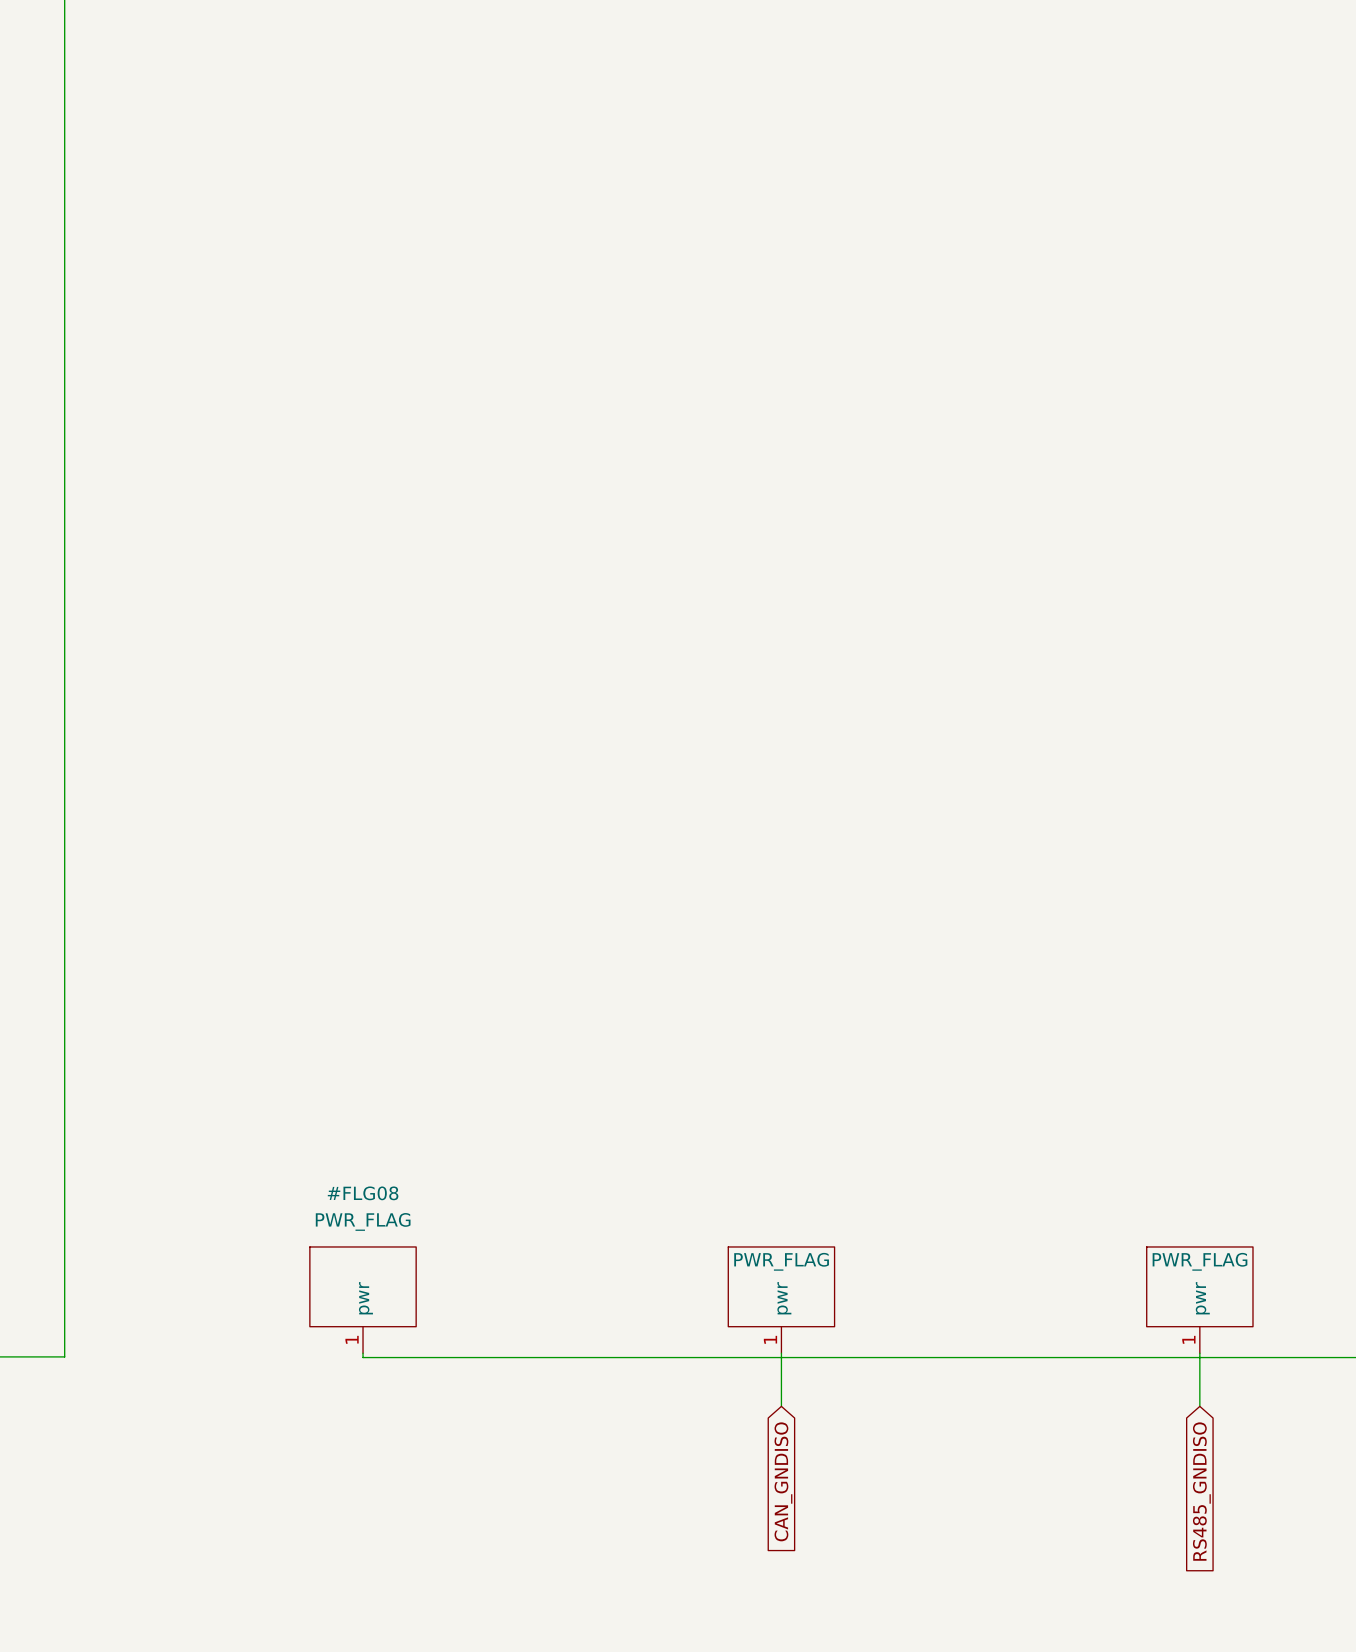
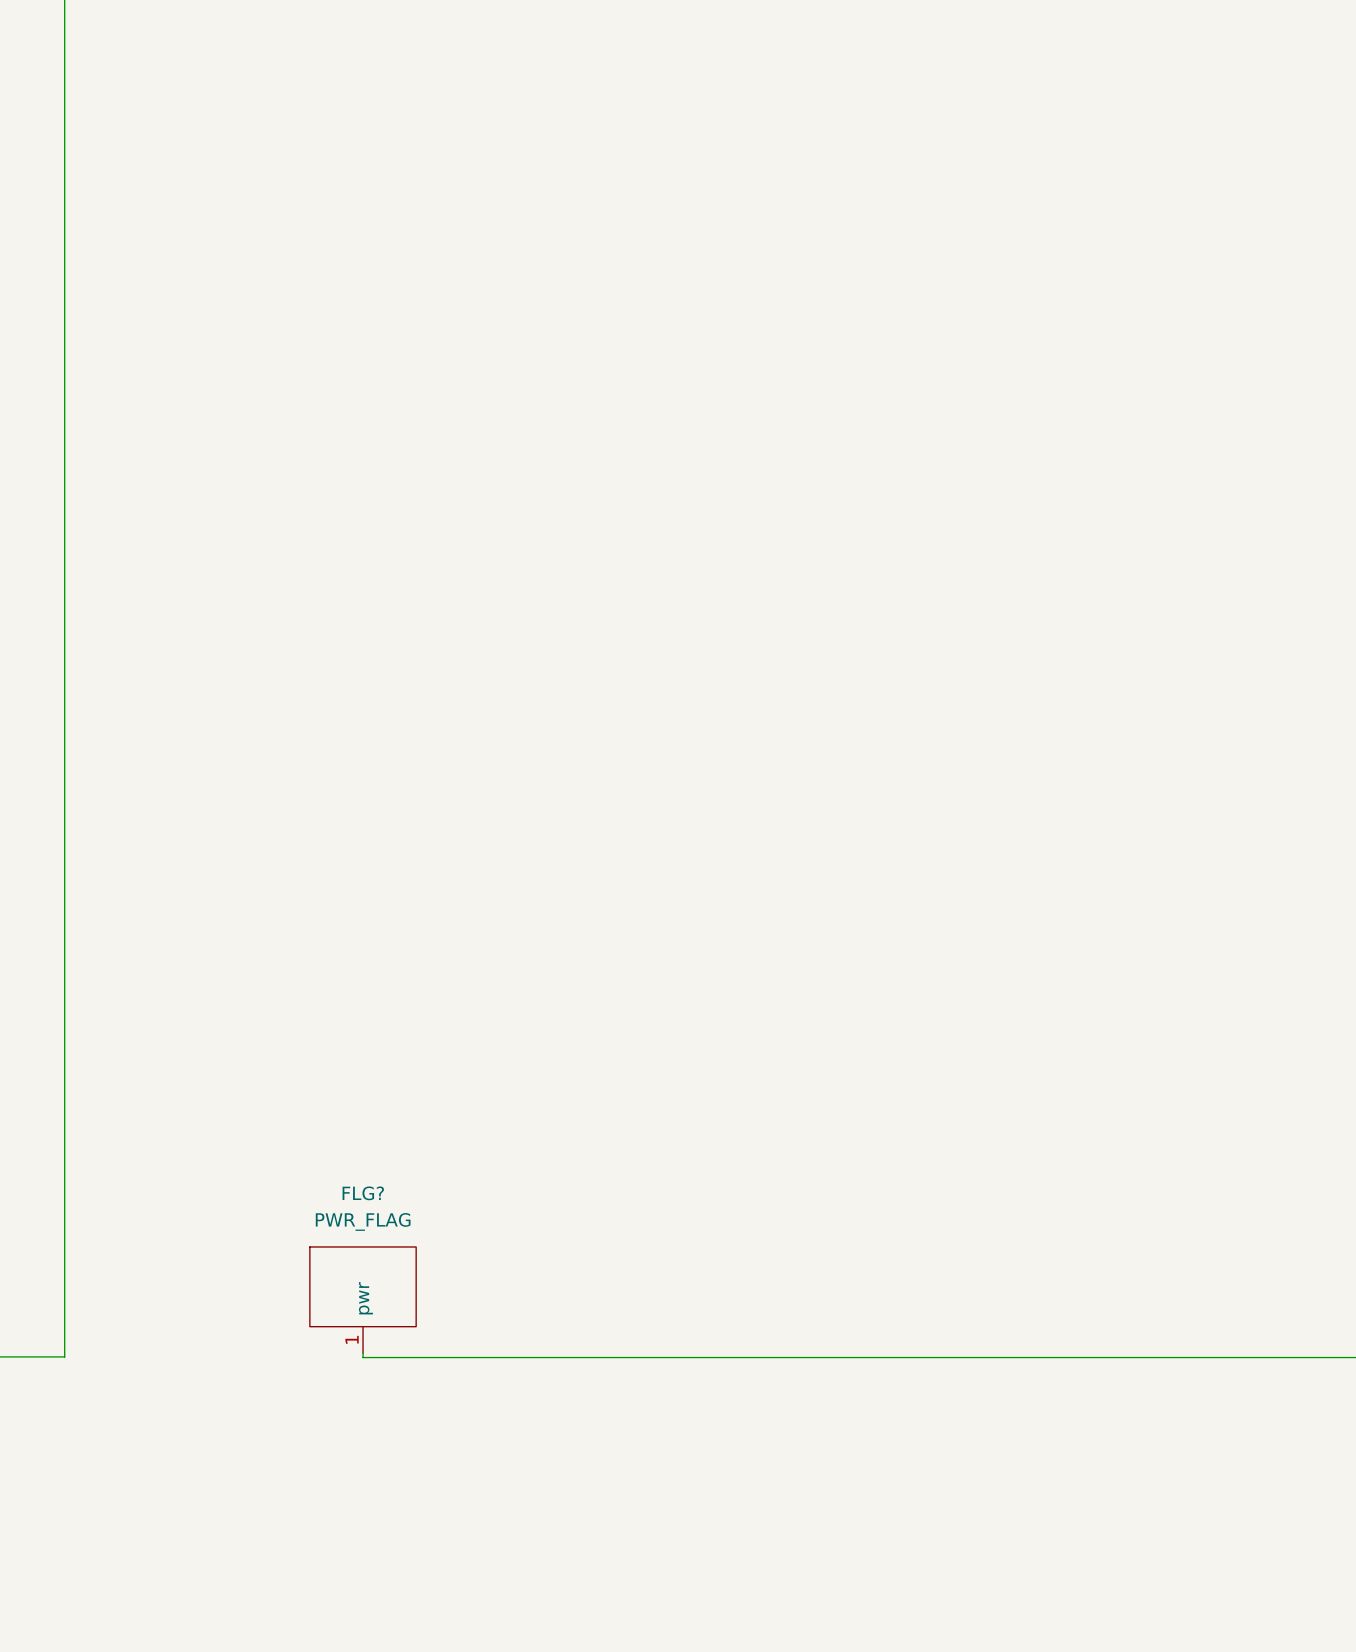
#FLG08 name: #FLG08 (363, 1193) -> FLG? (363, 1193)
power symbol: PWR_FLAG (781, 1300) -> none
power symbol: PWR_FLAG (1199, 1300) -> none
wire: (781, 1353) (781, 1406) -> none
wire: (1199, 1353) (1199, 1406) -> none
global label: CAN_GNDISO (783, 1481) -> none
global label: RS485_GNDISO (1201, 1491) -> none

